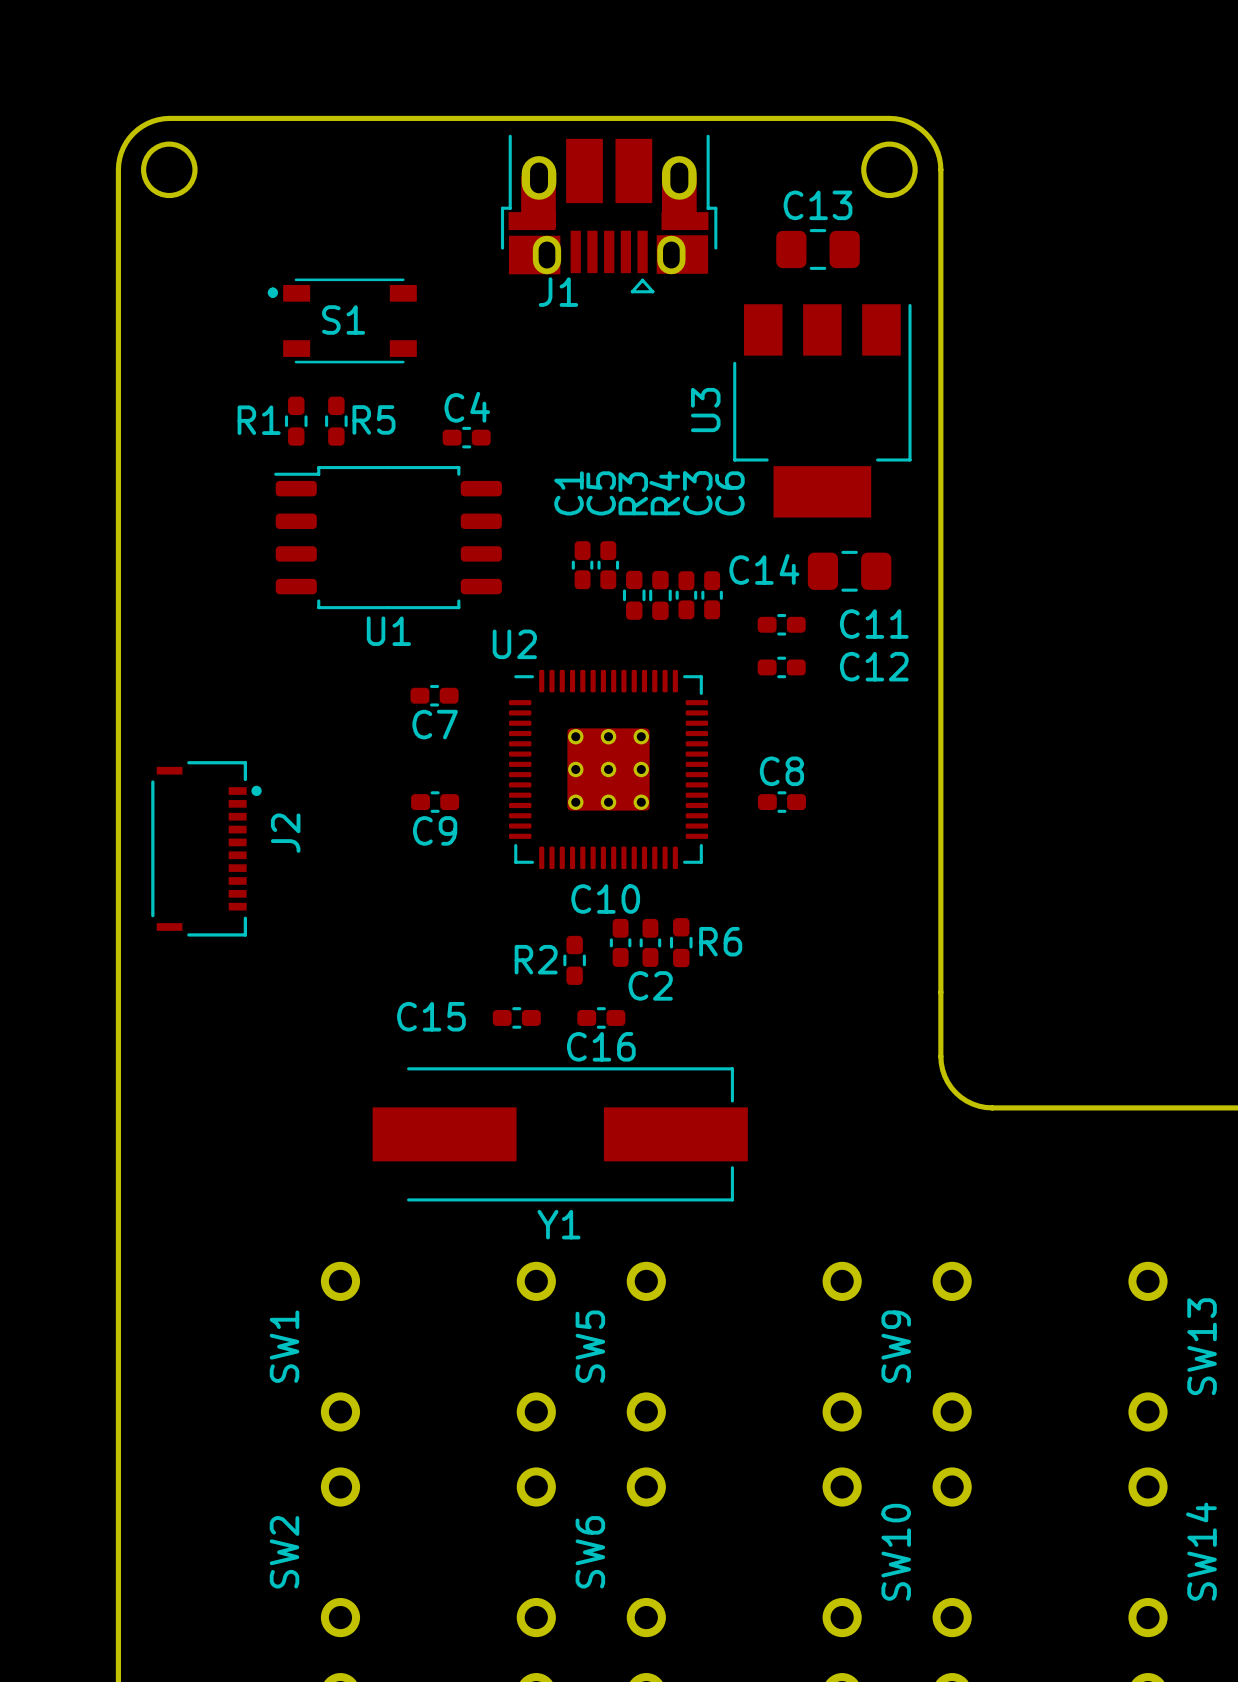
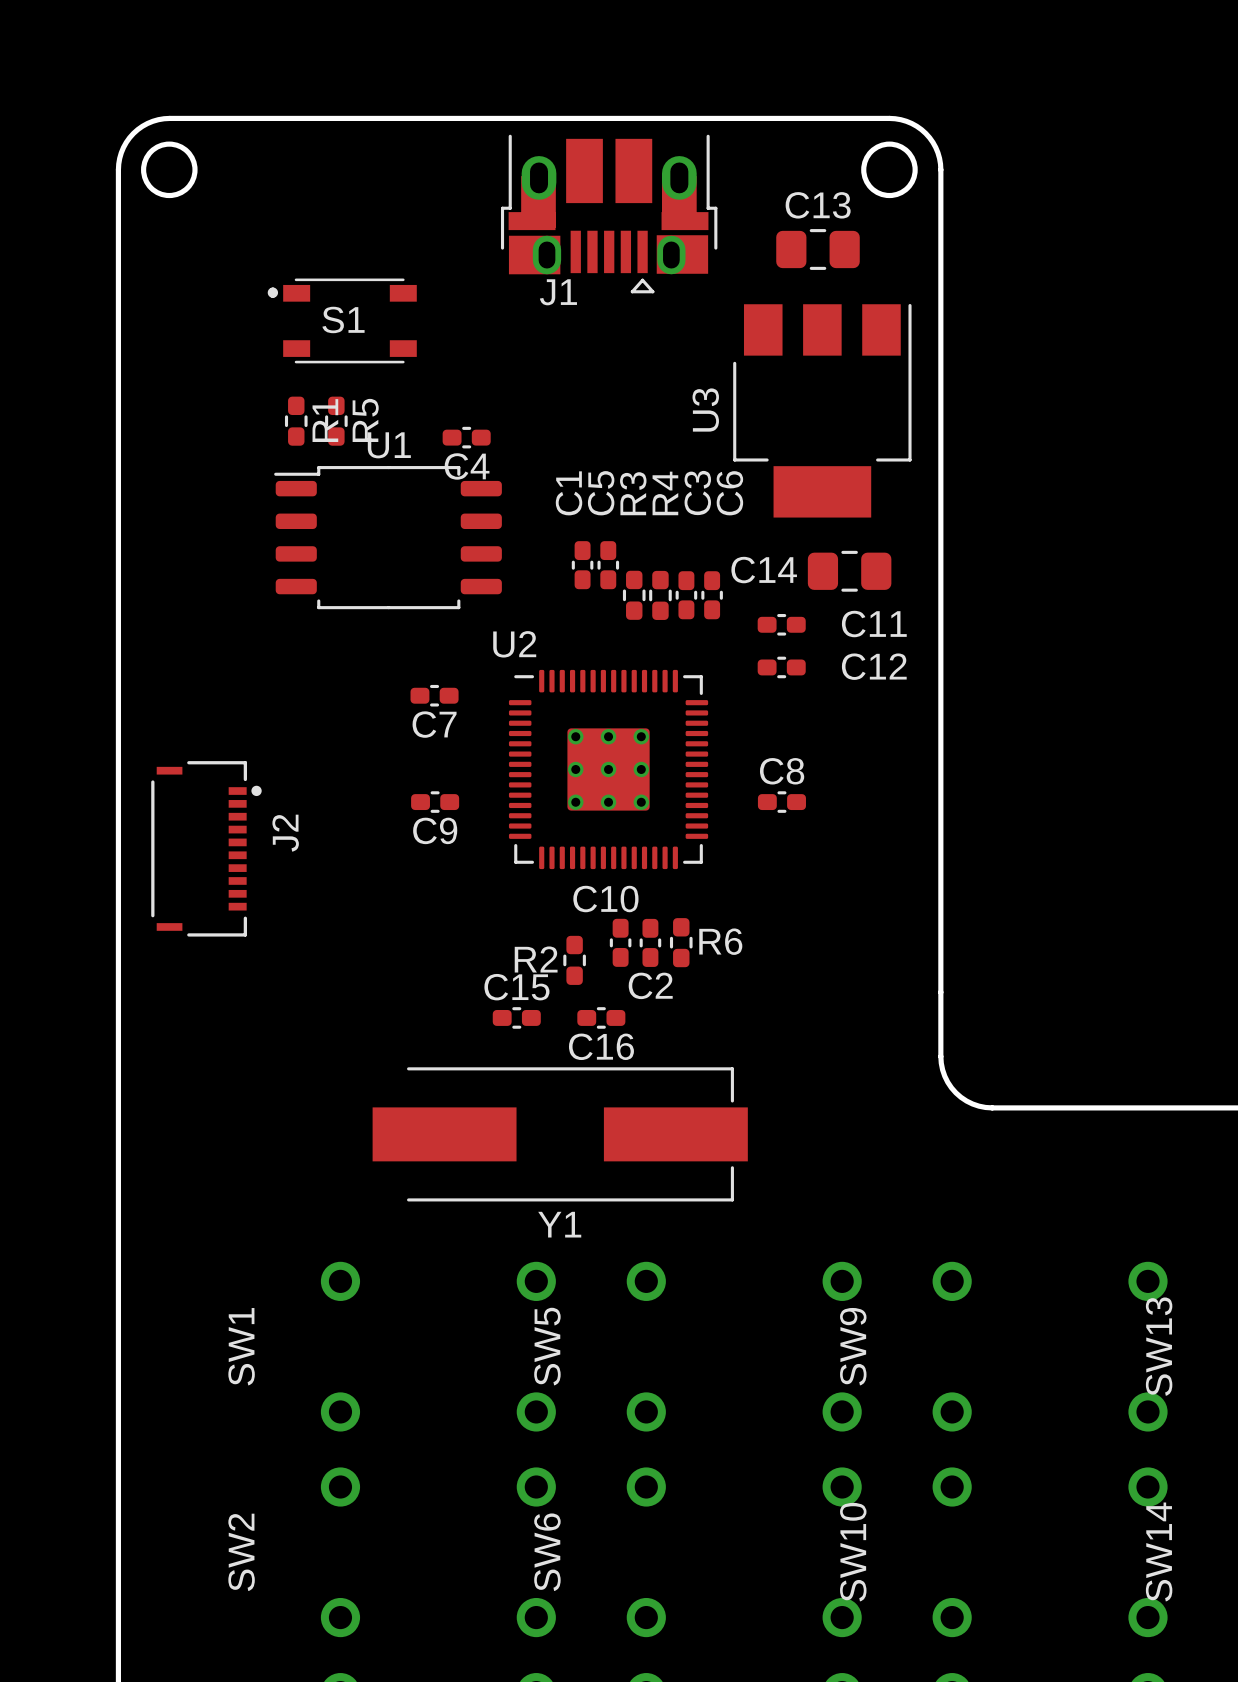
C4 name position: C4 (467, 407) -> C4 (467, 466)
R5 name rotation: 0° (373, 419) -> 90° counterclockwise (365, 420)
R1 name rotation: 0° (259, 420) -> 90° counterclockwise (325, 420)
R1 name position: R1 (259, 420) -> R1 (325, 420)
U1 name position: U1 (388, 631) -> U1 (389, 445)
C15 name position: C15 (431, 1016) -> C15 (516, 987)
SW1 name position: SW1 (284, 1346) -> SW1 (241, 1346)
SW5 name position: SW5 (590, 1346) -> SW5 (547, 1346)
SW9 name position: SW9 (896, 1346) -> SW9 (853, 1346)
SW13 name position: SW13 (1202, 1346) -> SW13 (1159, 1346)
SW14 name position: SW14 (1201, 1551) -> SW14 (1159, 1551)
SW2 name position: SW2 (284, 1552) -> SW2 (241, 1552)
SW6 name position: SW6 (590, 1552) -> SW6 (547, 1552)
SW10 name position: SW10 (896, 1552) -> SW10 (853, 1552)

